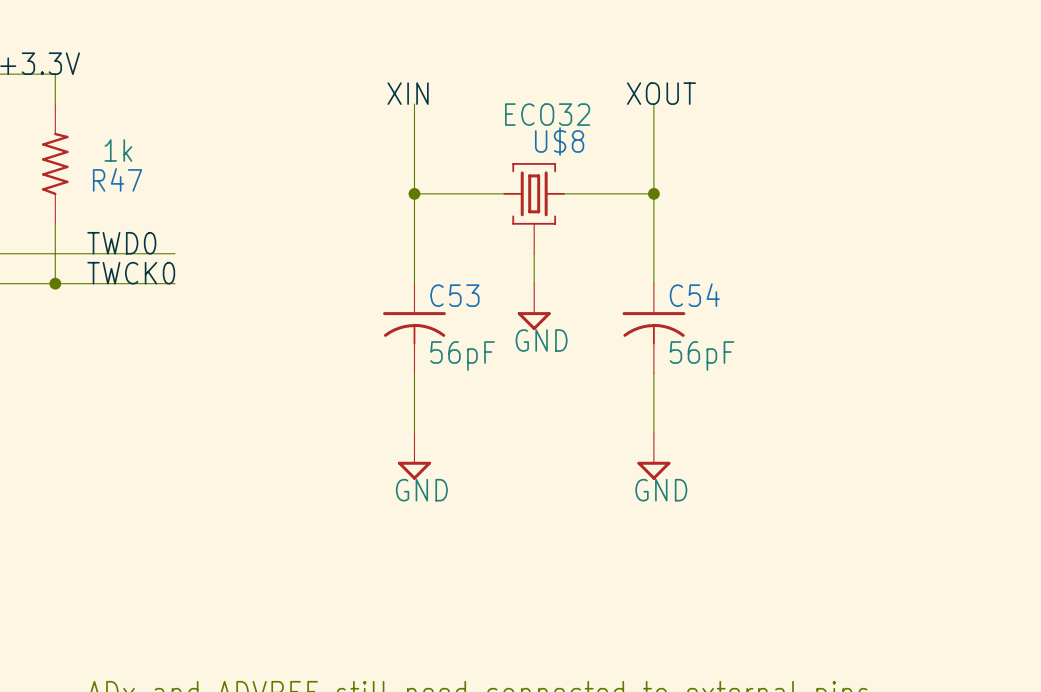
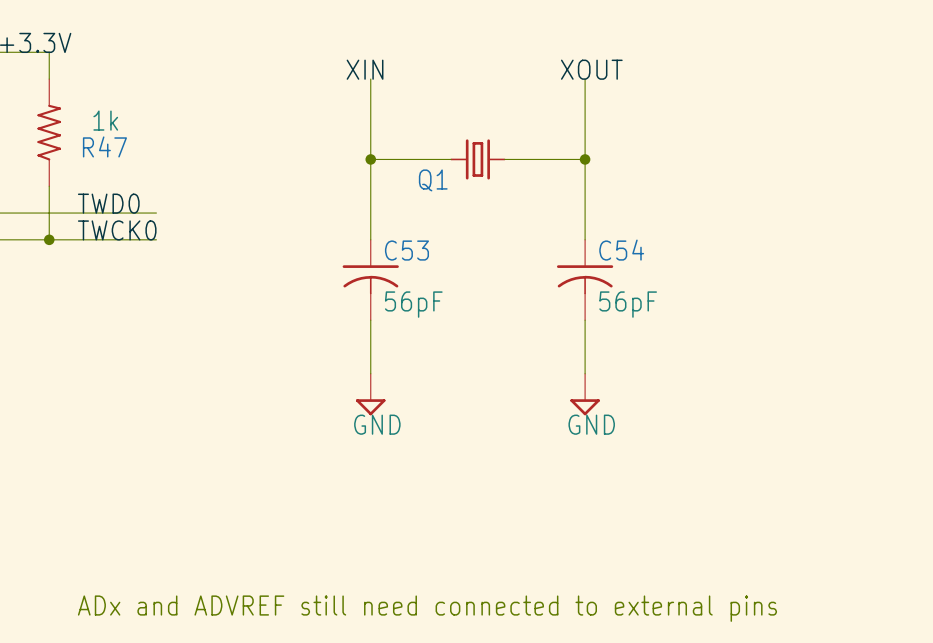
Q1: none -> (477, 159)
U$8: ECO32 (534, 208) -> none
wire: (534, 253) (534, 283) -> none
power symbol: GND (534, 306) -> none

